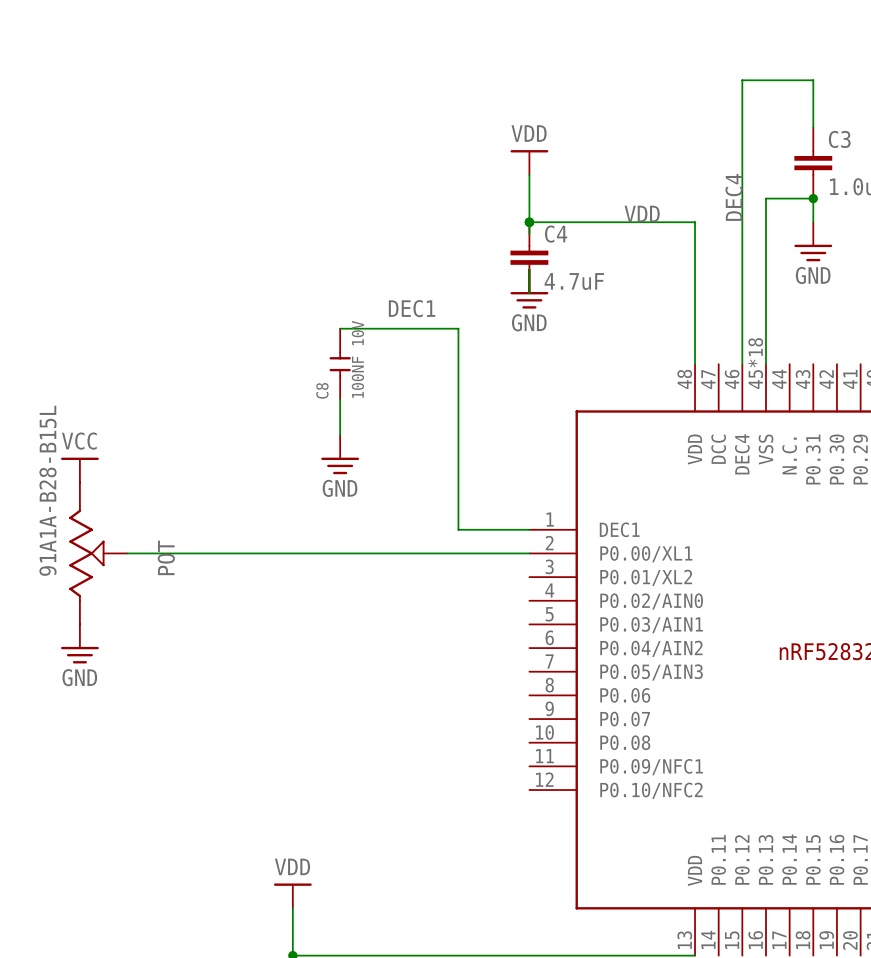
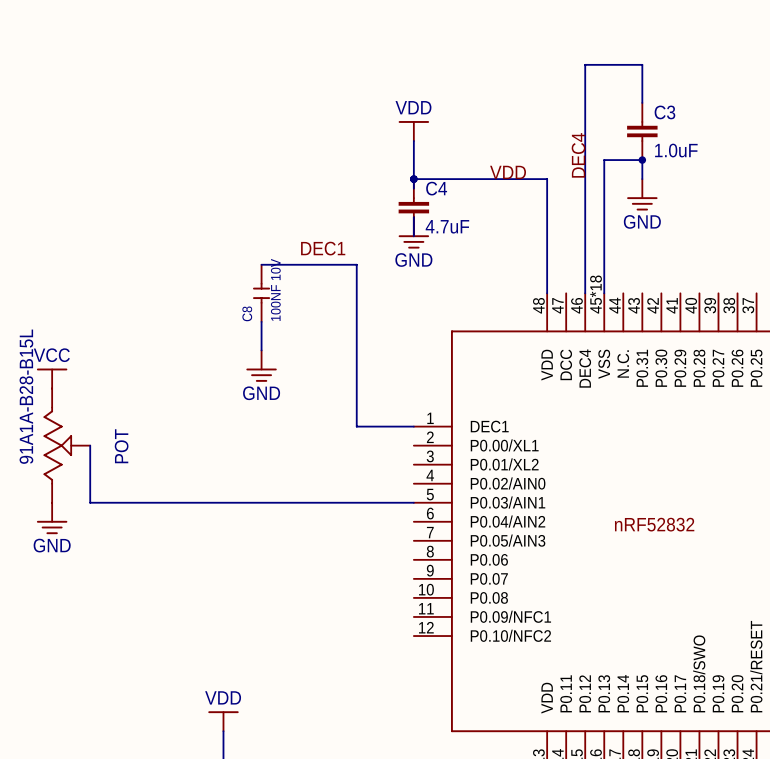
wire: (127, 553) (529, 553) -> (90, 445) (90, 502) (413, 502)

